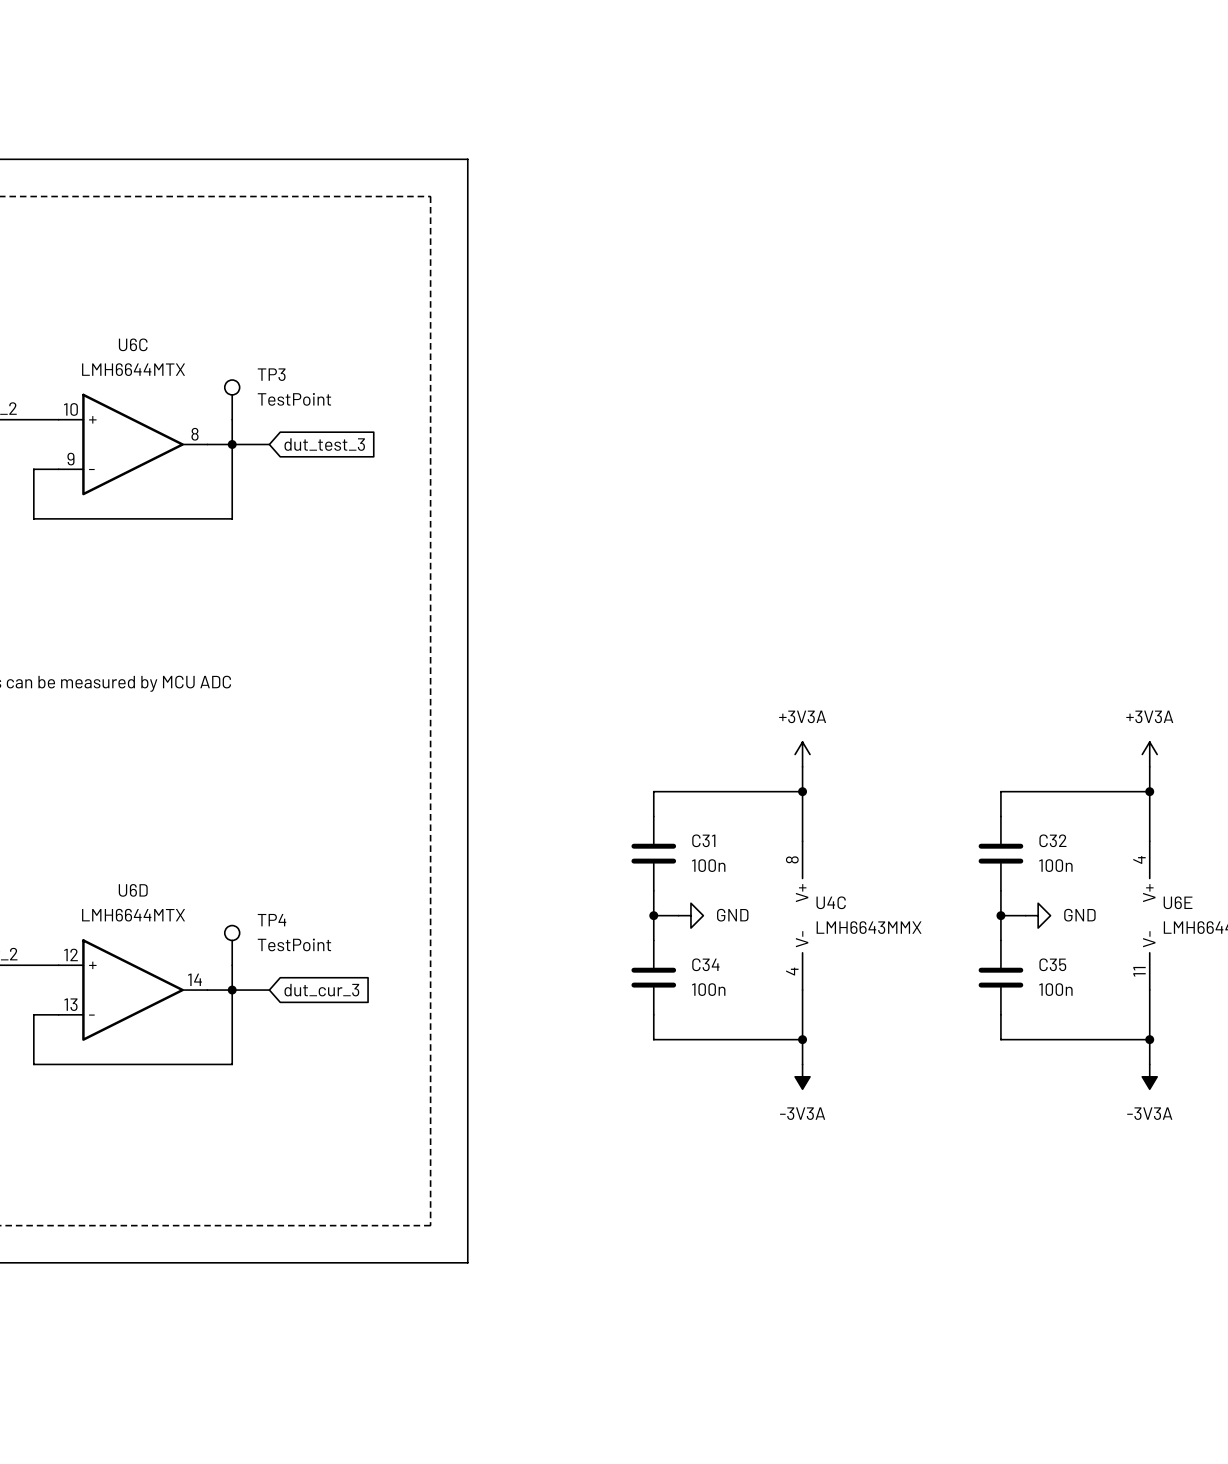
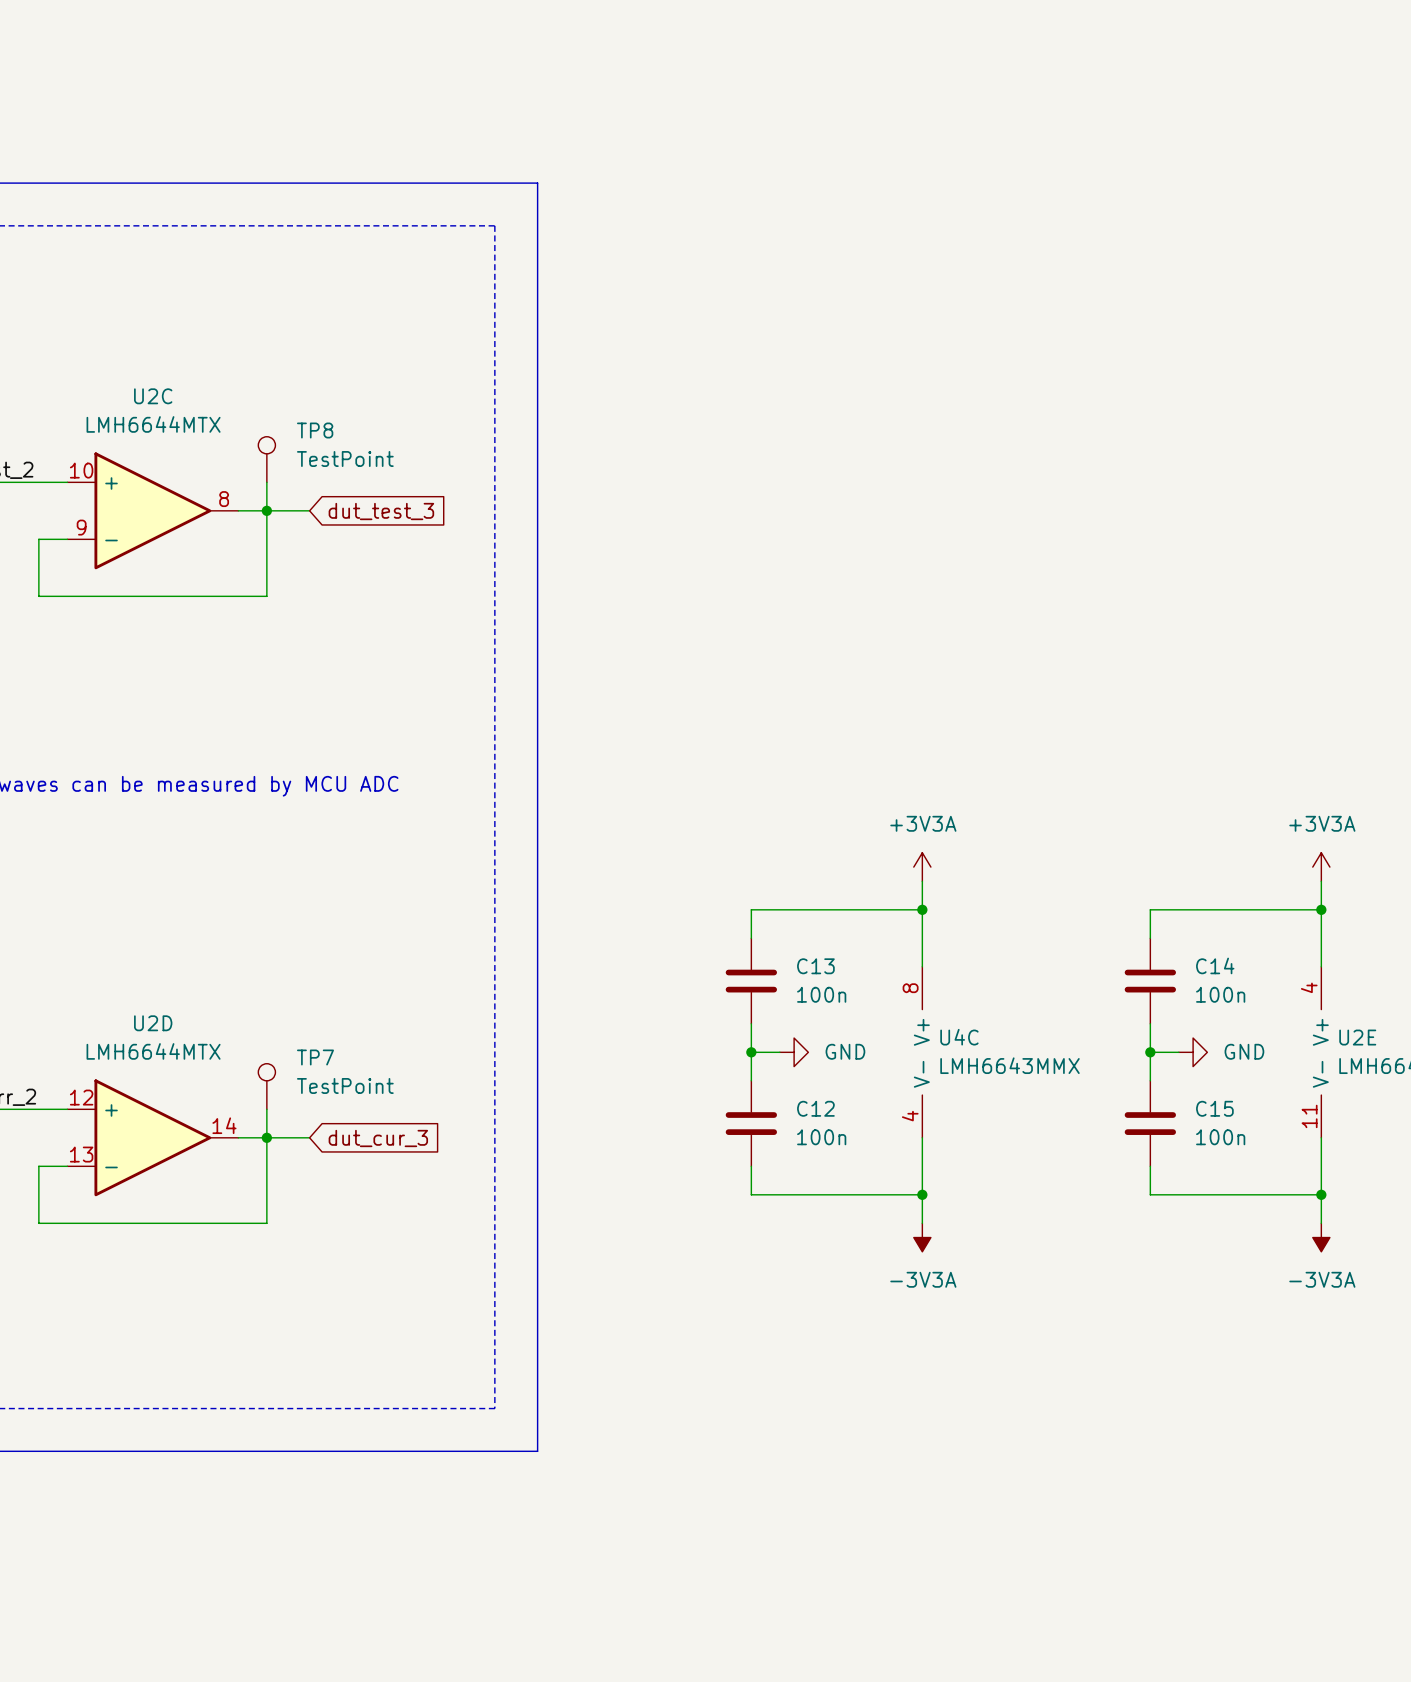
U6C name: U6C (133, 344) -> U2C (153, 396)
TP3 name: TP3 (271, 374) -> TP8 (315, 430)
C31 name: C31 (703, 840) -> C13 (815, 966)
C32 name: C32 (1052, 840) -> C14 (1215, 965)
U6D name: U6D (133, 890) -> U2D (153, 1023)
U6E name: U6E (1178, 902) -> U2E (1357, 1037)
TP4 name: TP4 (272, 920) -> TP7 (315, 1057)
C34 name: C34 (705, 964) -> C12 (815, 1108)
C35 name: C35 (1052, 964) -> C15 (1214, 1108)

